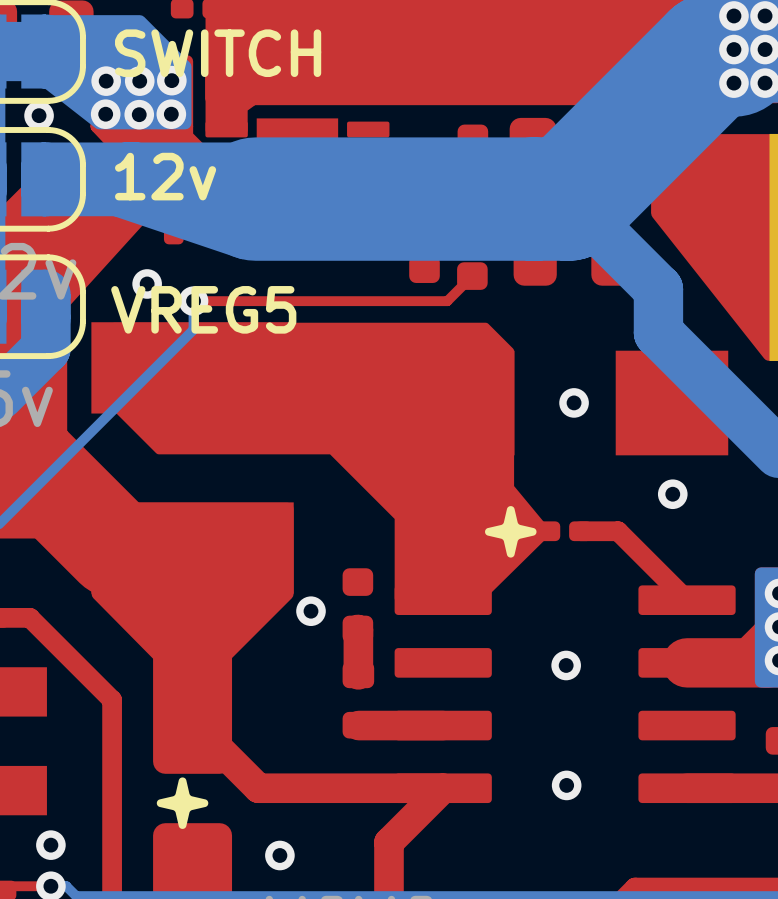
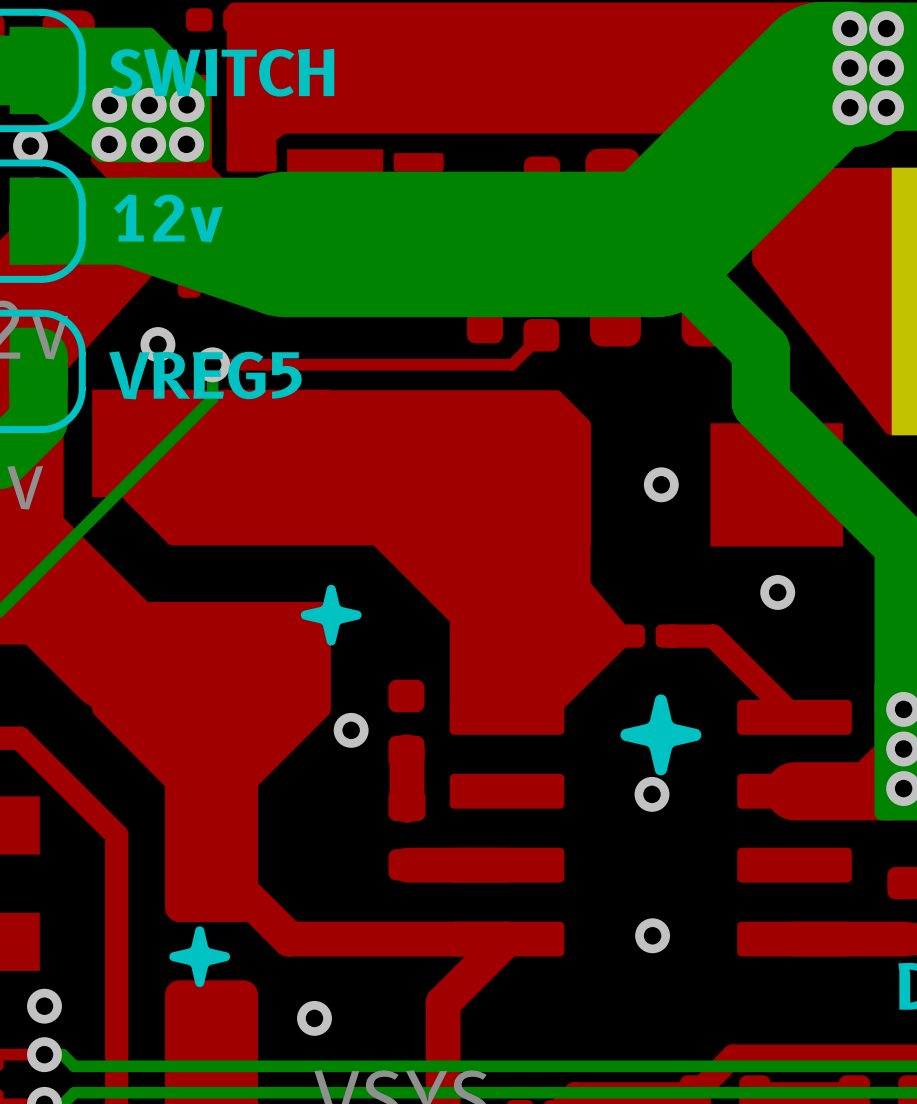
drawing position: (510, 531) -> (331, 615)
drawing: none -> [620, 694, 702, 776]

